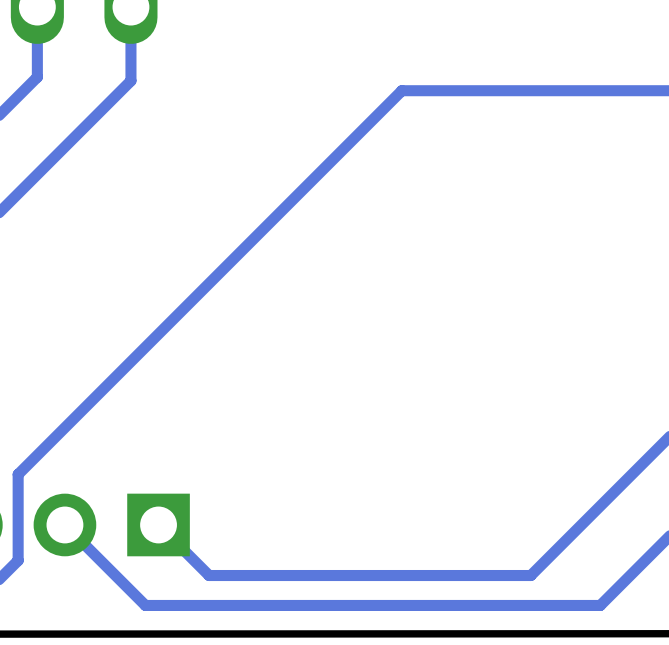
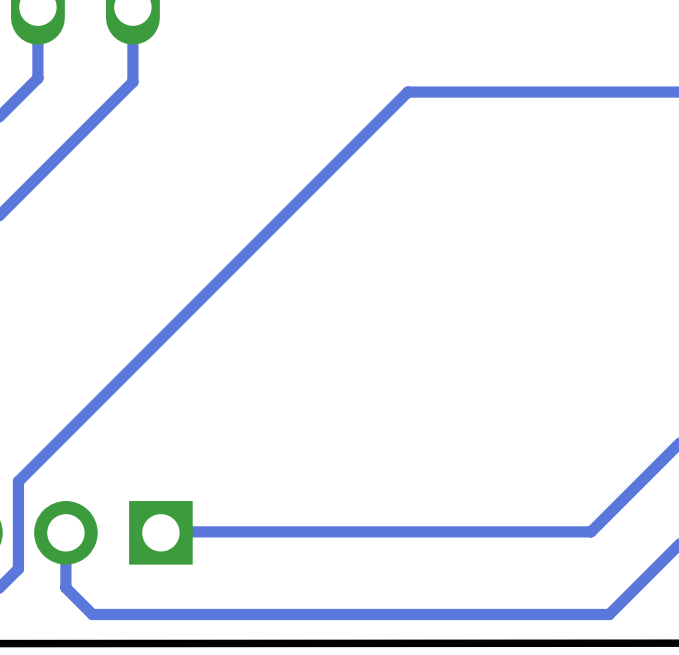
bottom track: (64, 524) (145, 605) -> (65, 532) (65, 587) (92, 614) (147, 614)
bottom track: (582, 524) (530, 575) (209, 575) (158, 524) -> (591, 531) (160, 532)

